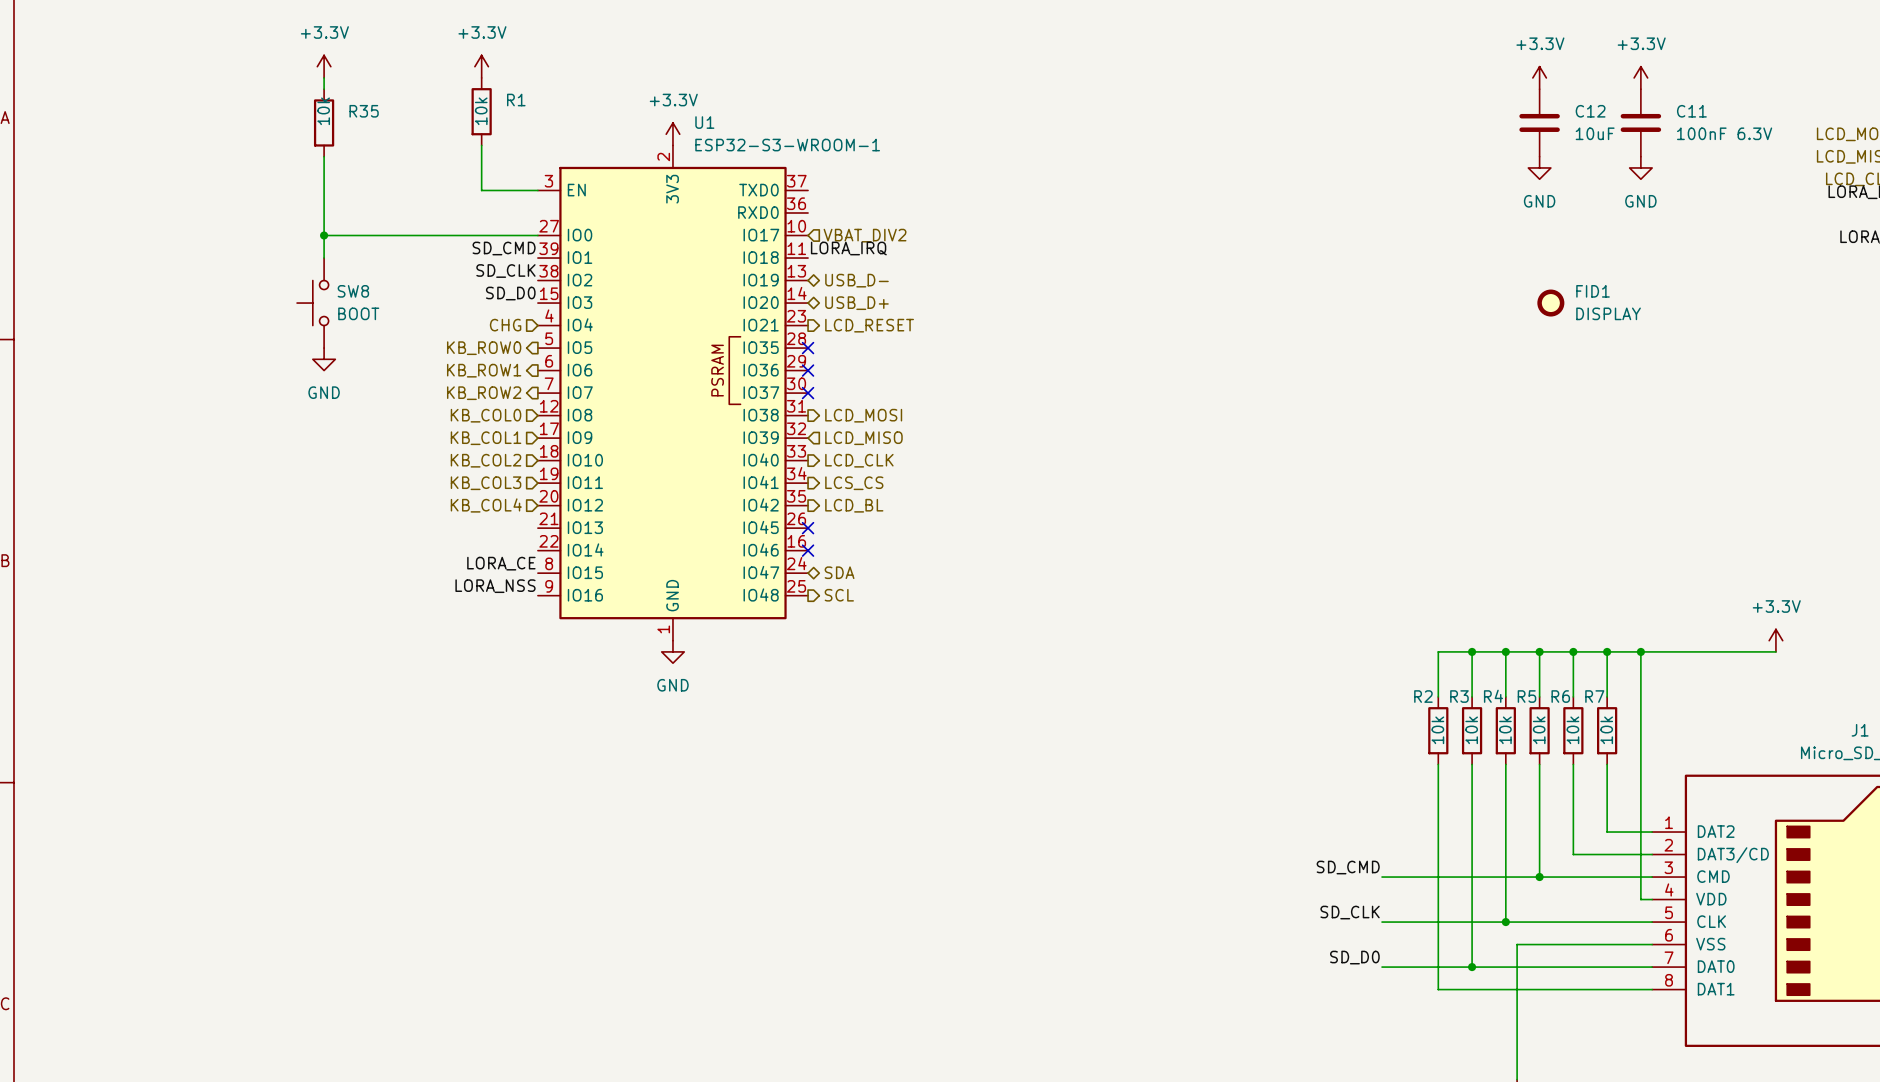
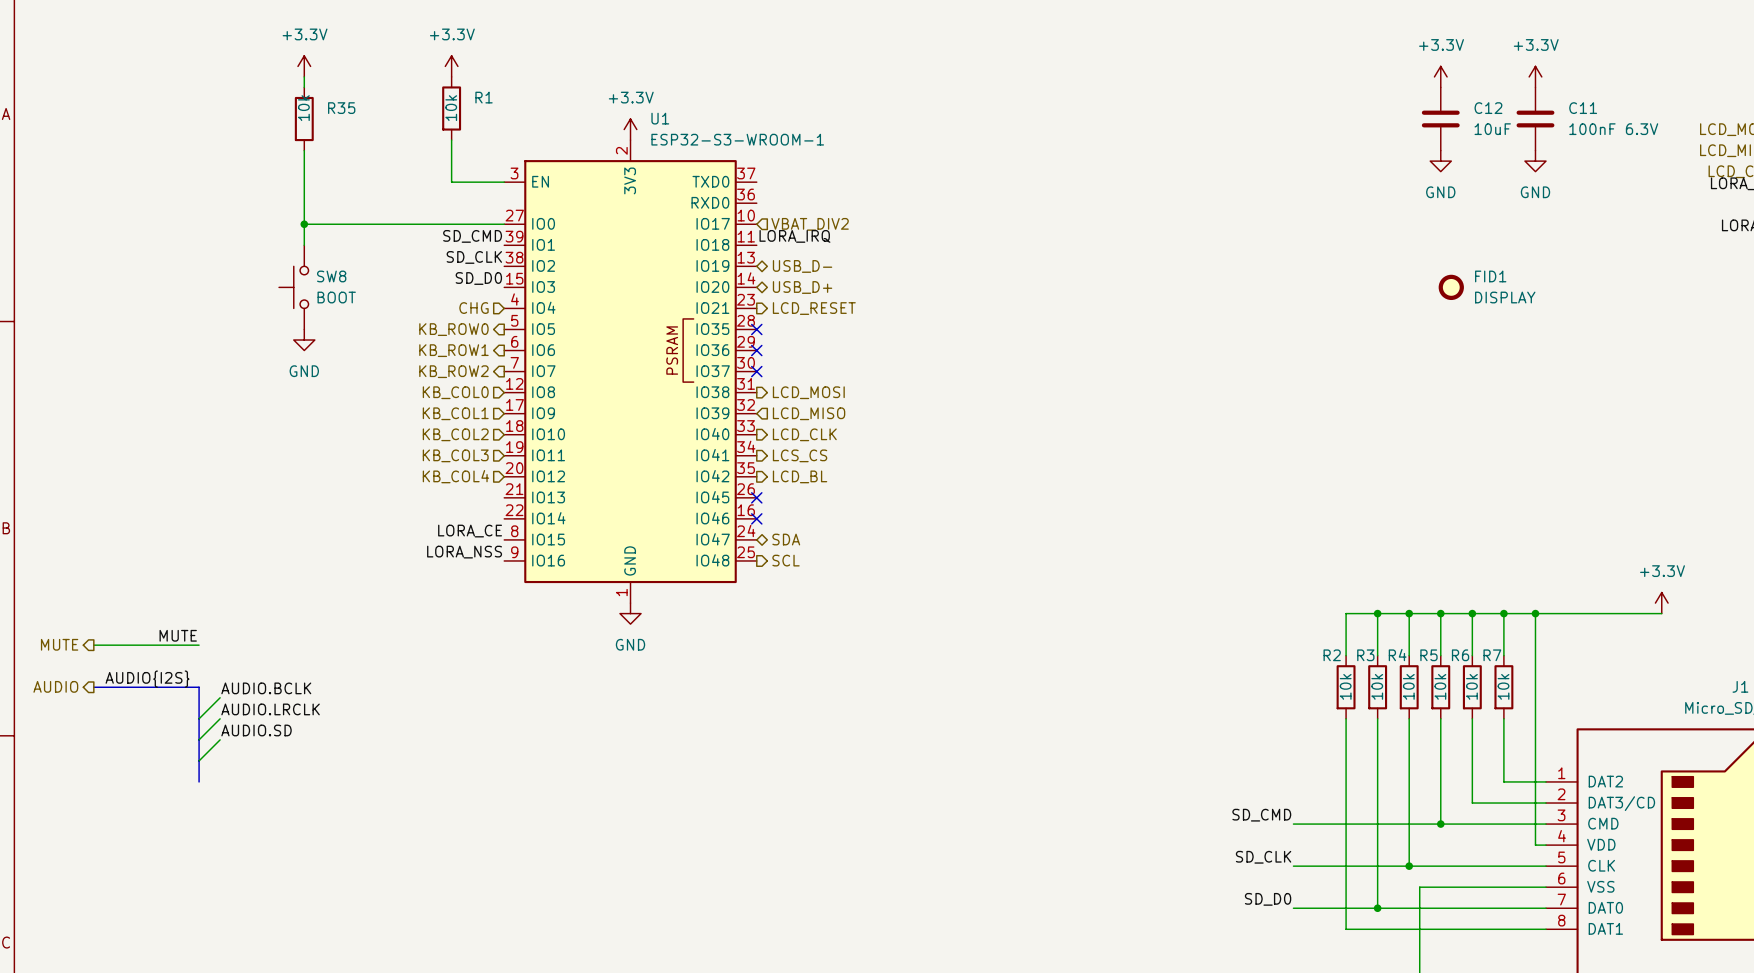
label: none -> MUTE (178, 635)
hierarchical label: none -> MUTE (59, 644)
wire: none -> (93, 645) (199, 645)
label: none -> AUDIO{I2S} (147, 679)
hierarchical label: none -> AUDIO (55, 686)
bus: none -> (93, 687) (199, 687) (199, 781)
label: none -> AUDIO.BCLK (266, 688)
wire: none -> (220, 697) (199, 718)
label: none -> AUDIO.LRCLK (270, 709)
wire: none -> (220, 718) (199, 739)
label: none -> AUDIO.SD (256, 730)
wire: none -> (220, 739) (199, 760)

